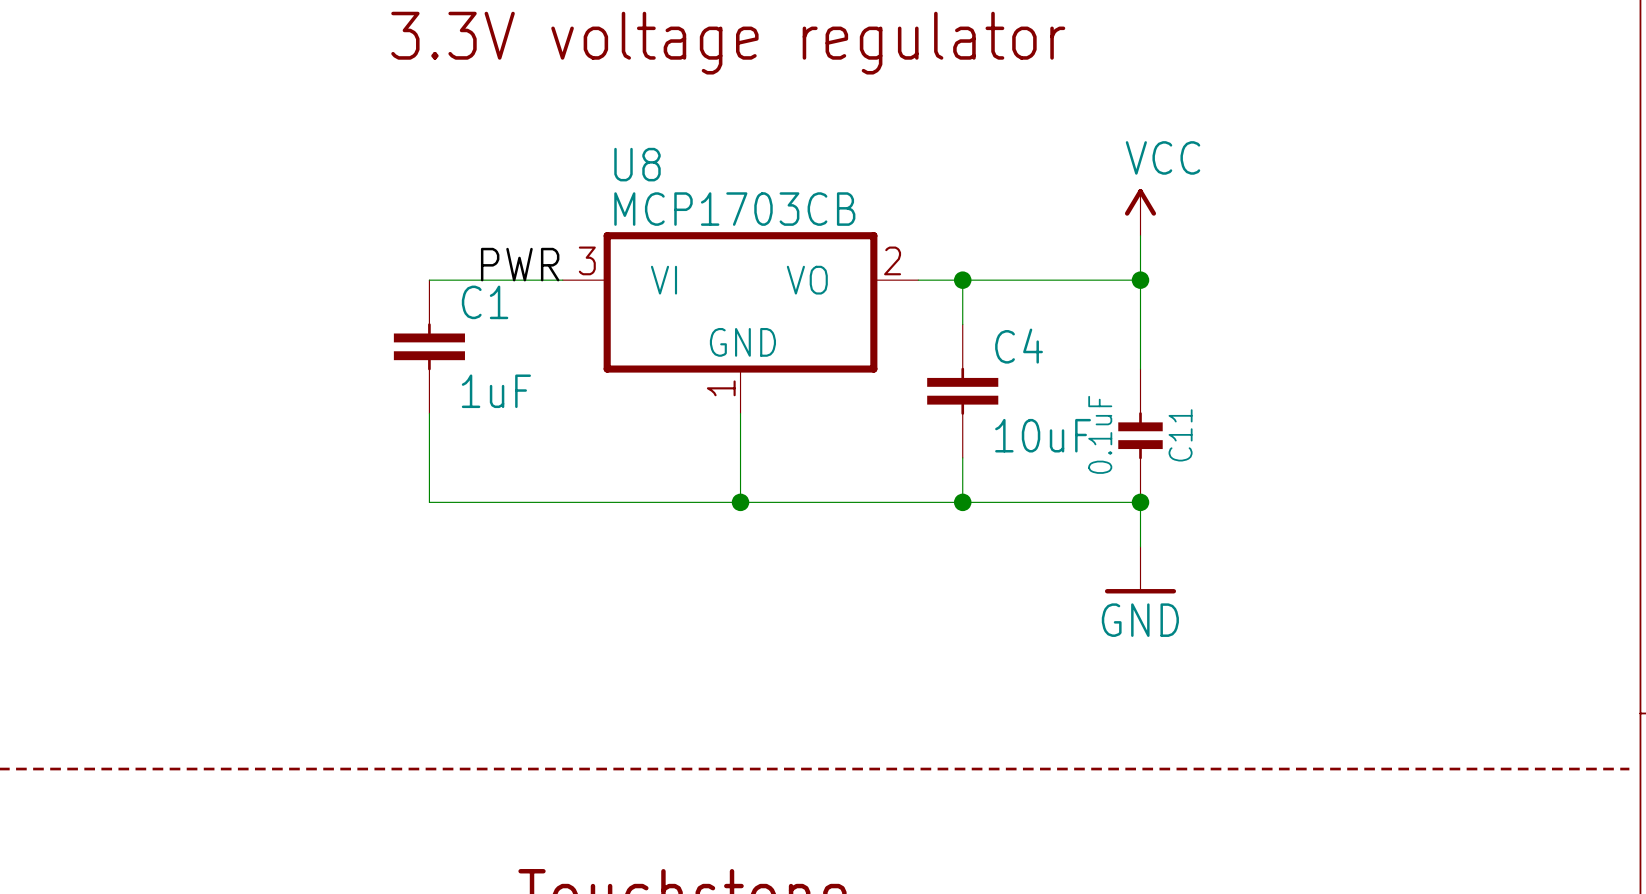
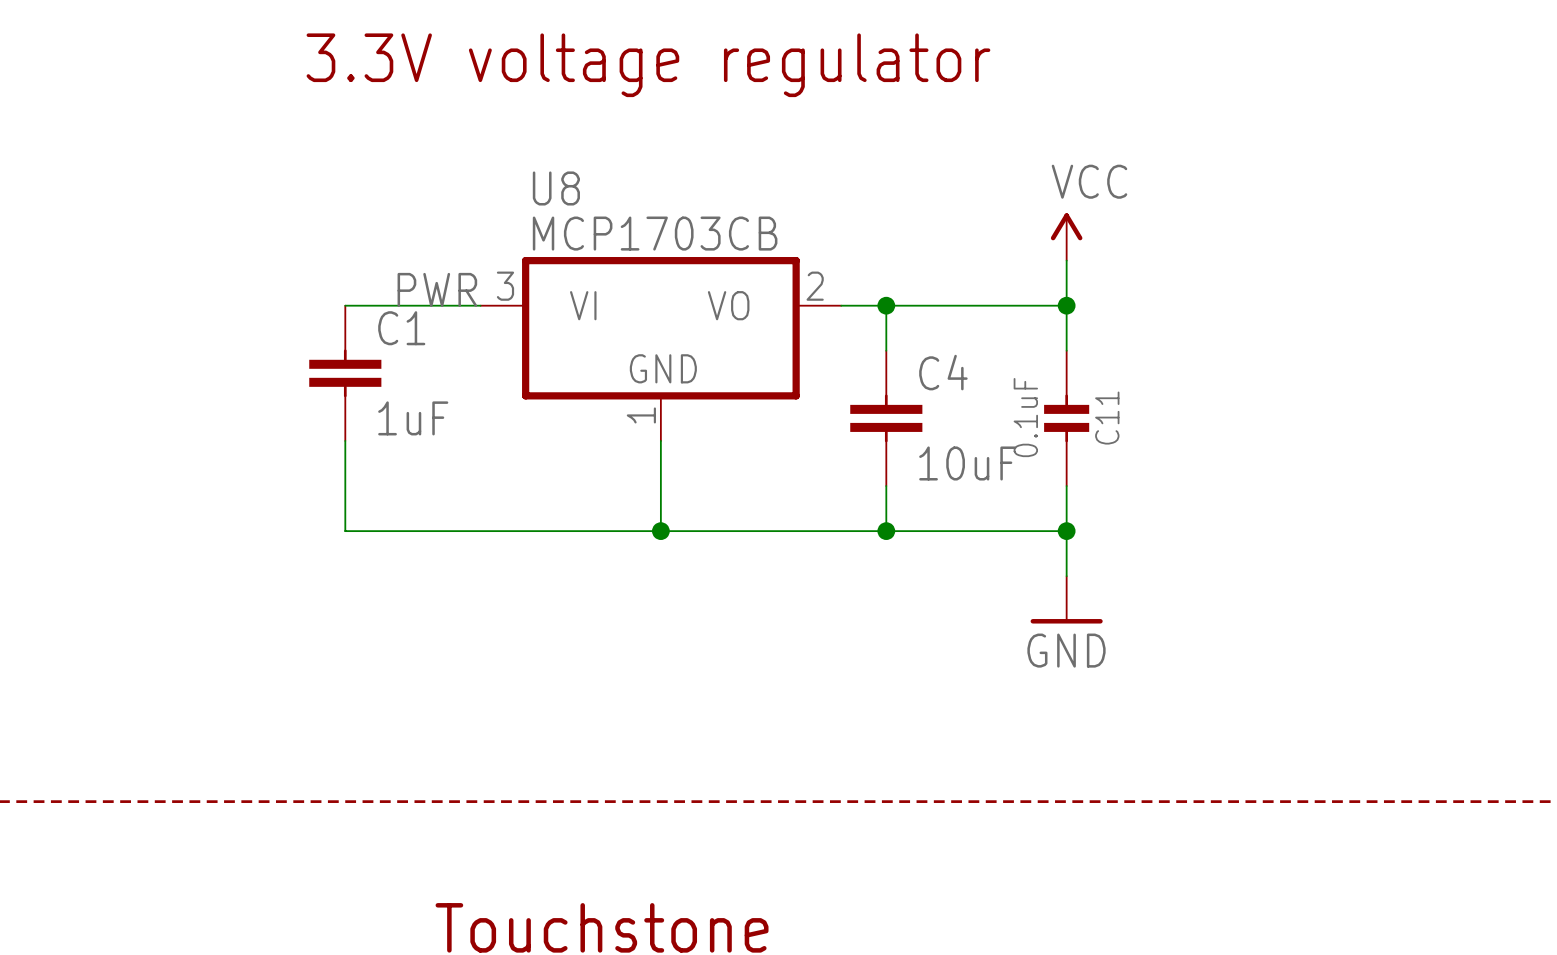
C11 position: (1140, 435) -> (1066, 418)

